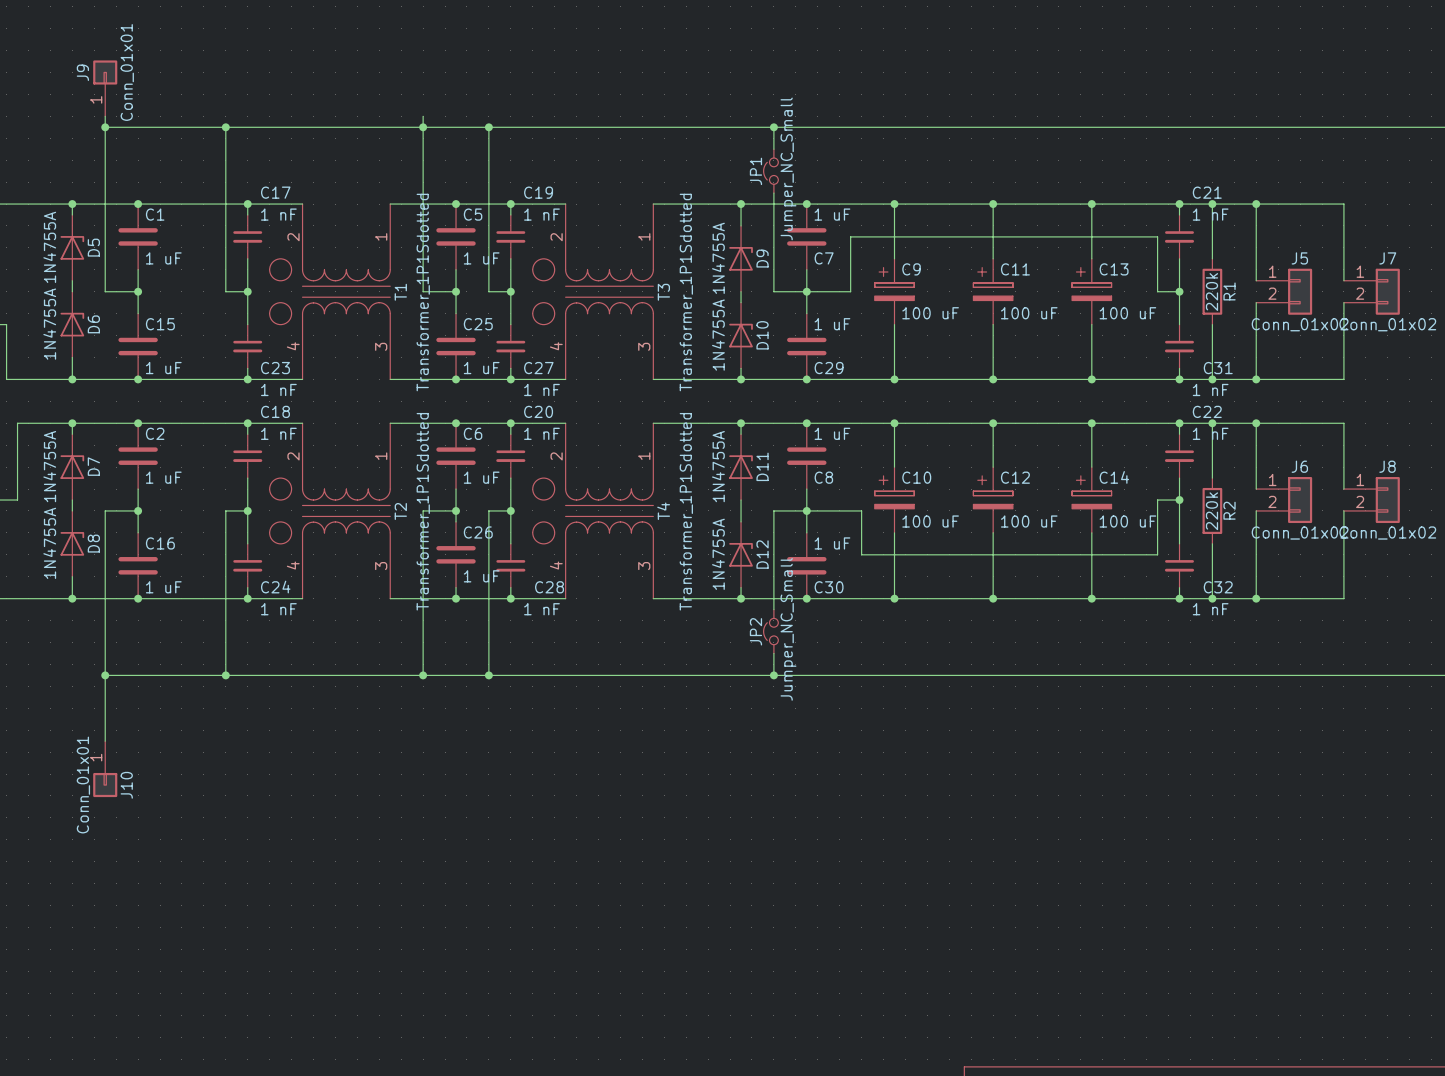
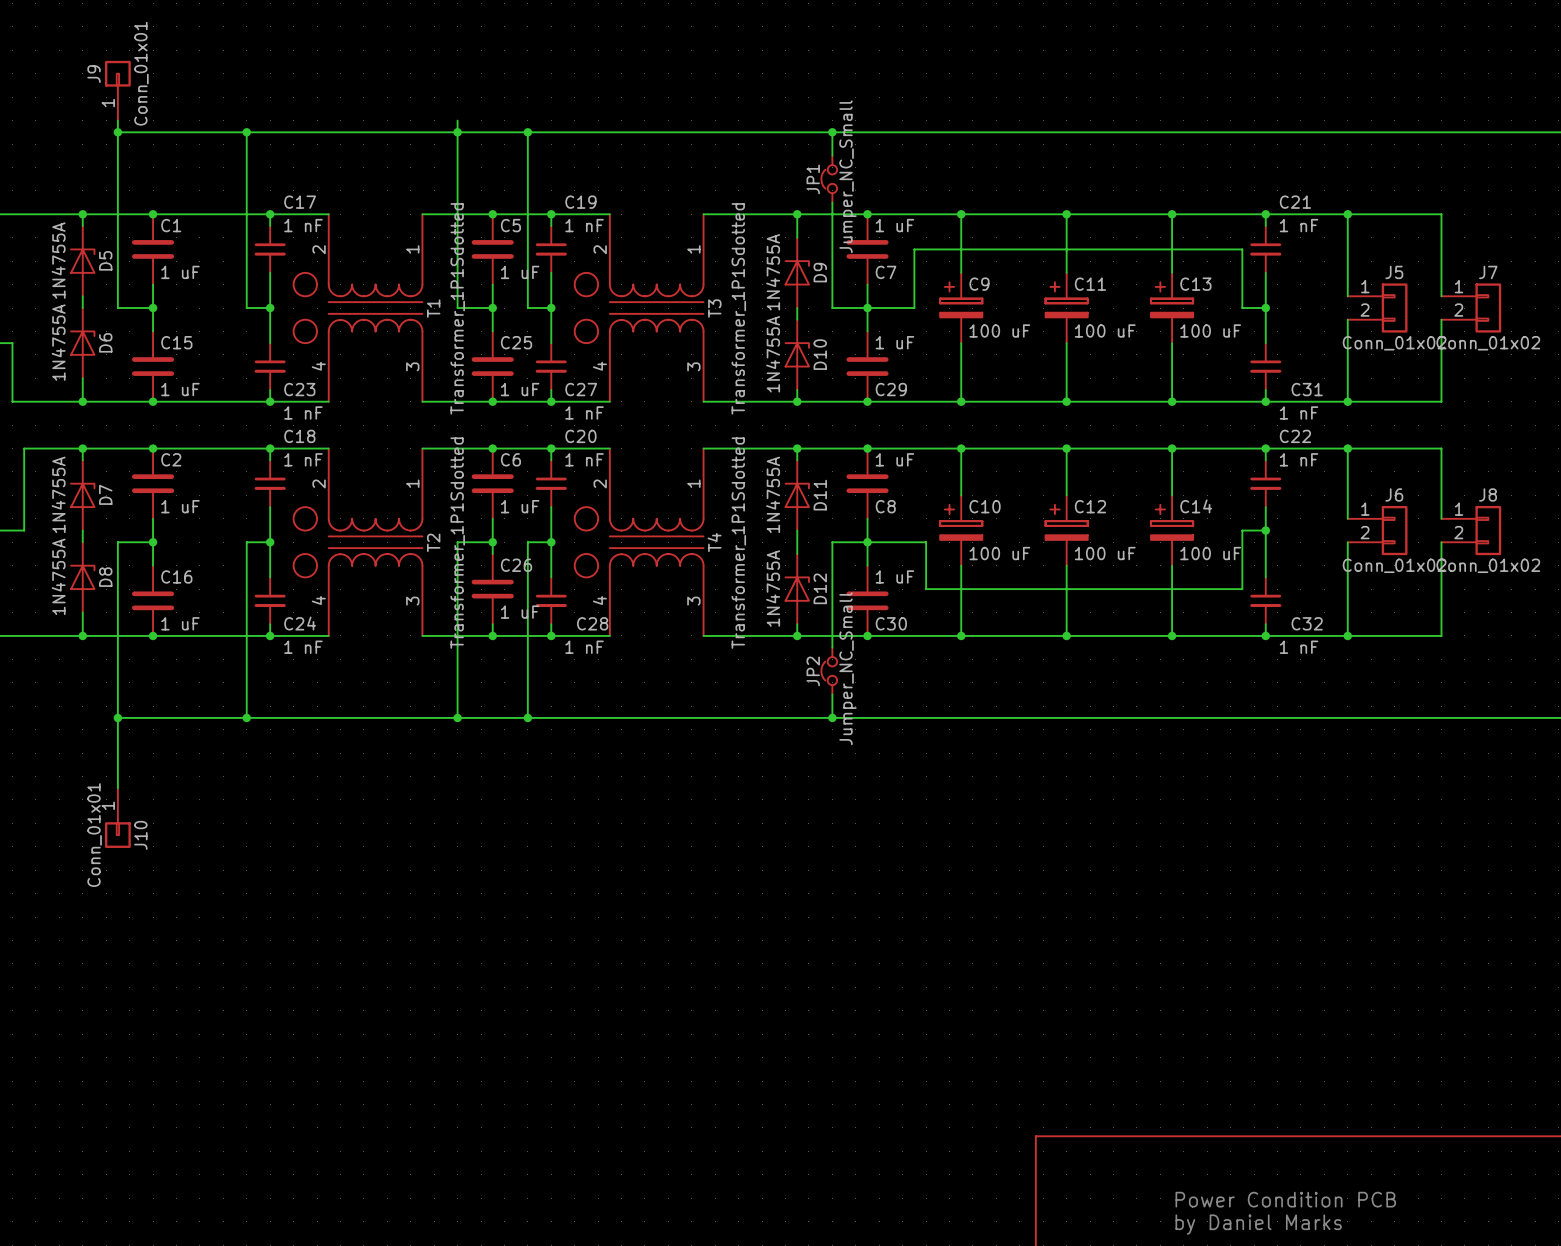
wire: (1212, 204) (1212, 258) -> none
junction: (1212, 204) -> none
R1: 220k (1212, 291) -> none
wire: (1212, 324) (1212, 379) -> none
junction: (1212, 379) -> none
wire: (1212, 423) (1212, 478) -> none
junction: (1212, 423) -> none
R2: 220k (1212, 510) -> none
wire: (1212, 543) (1212, 598) -> none
junction: (1212, 598) -> none

